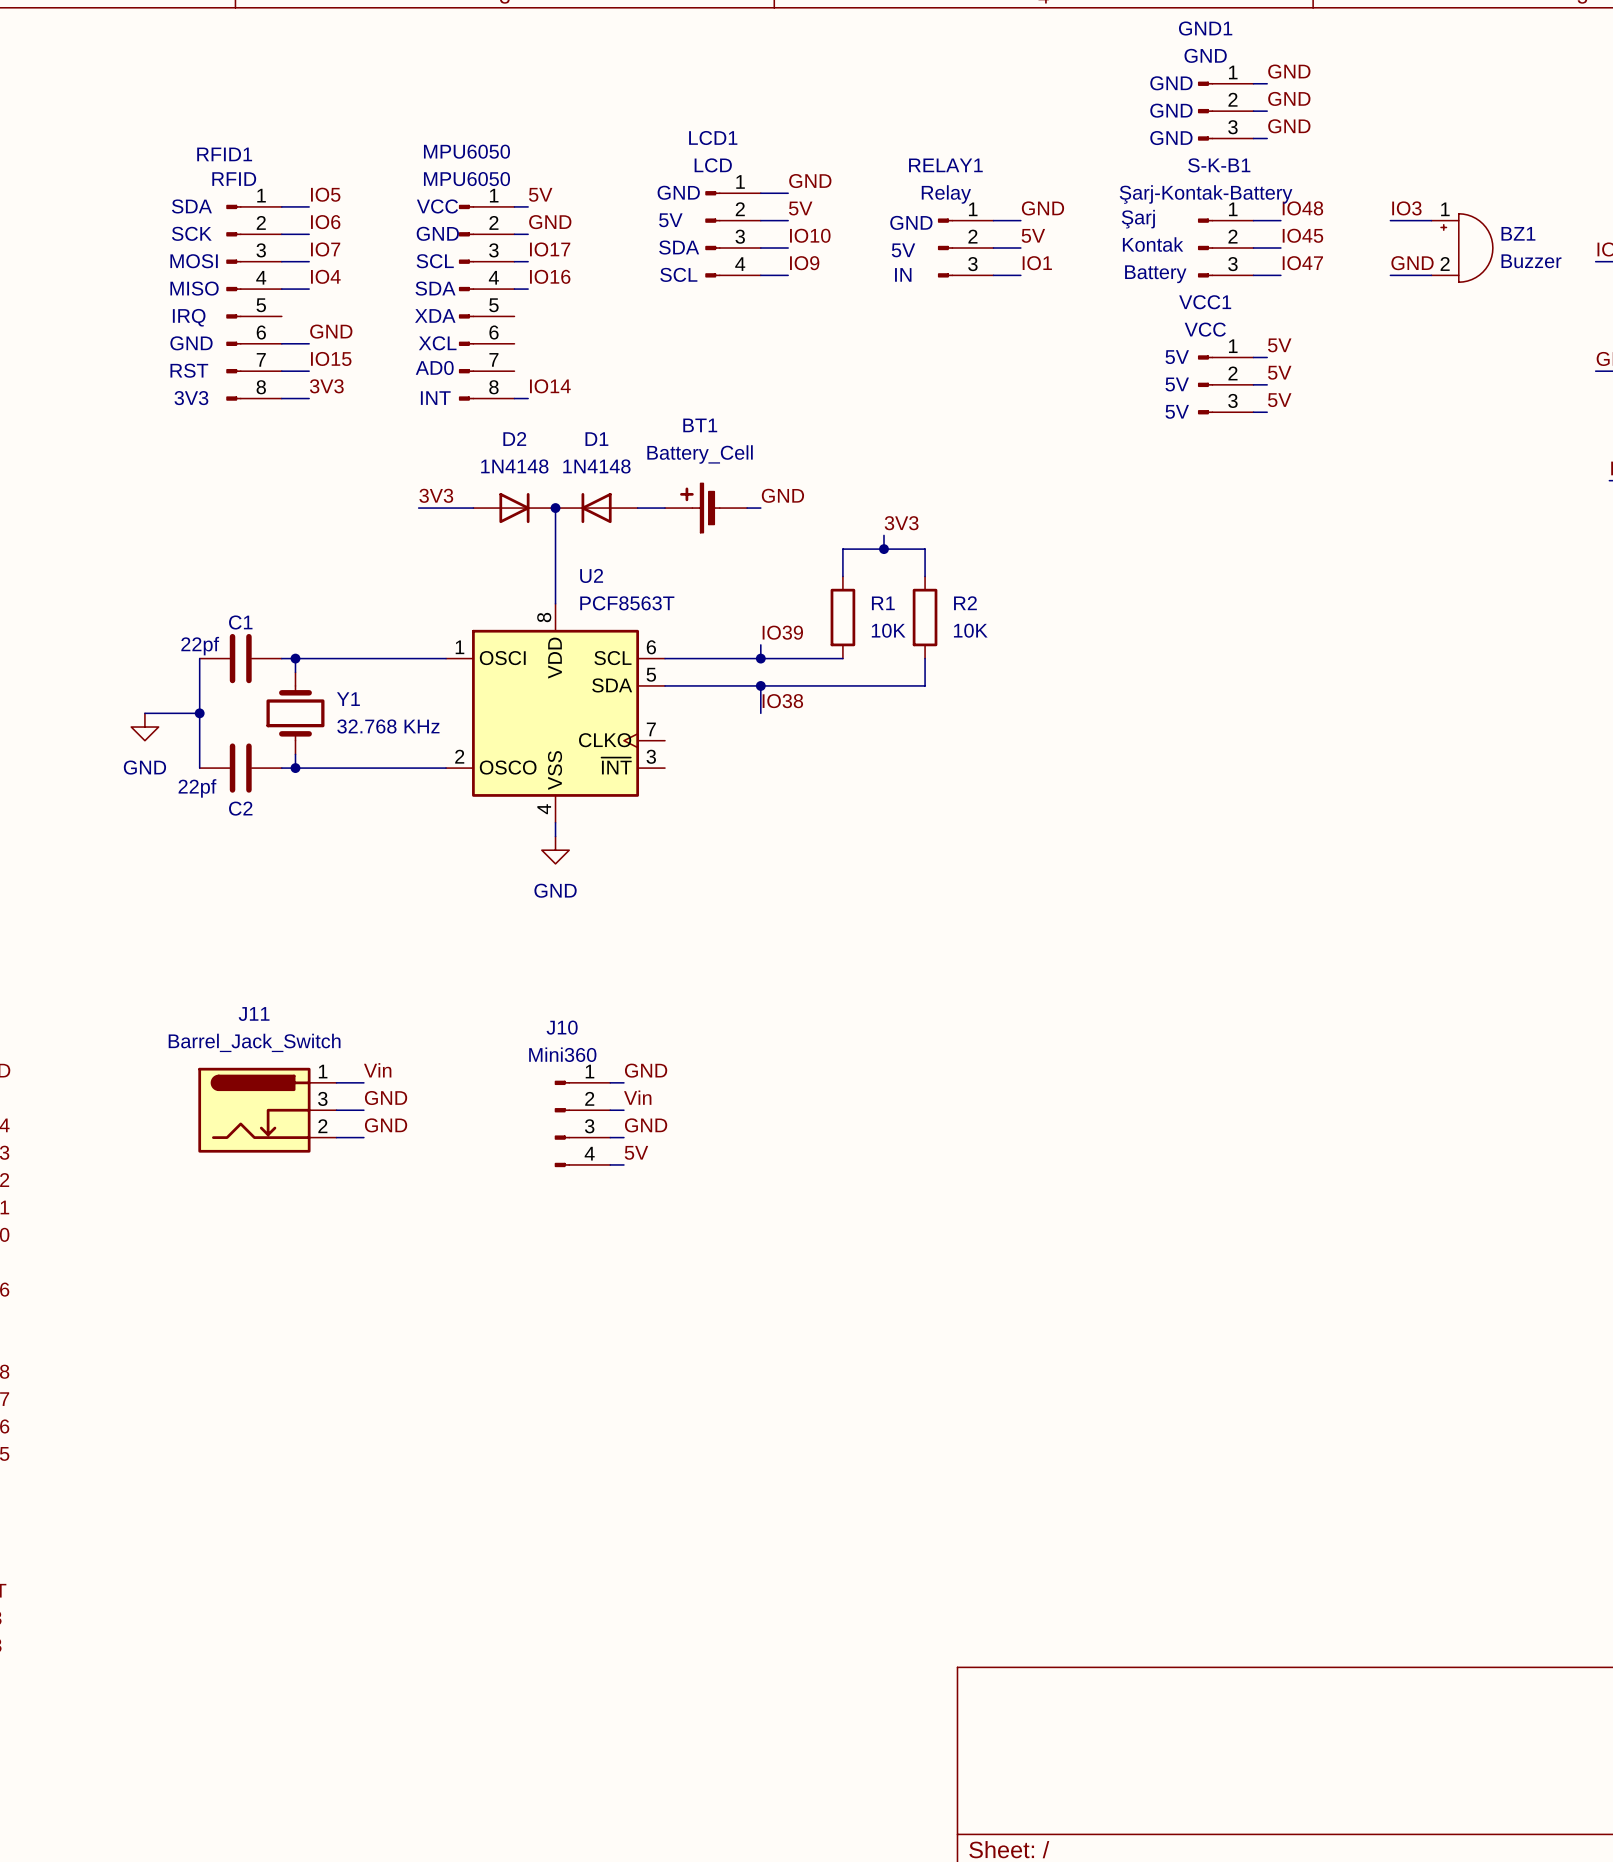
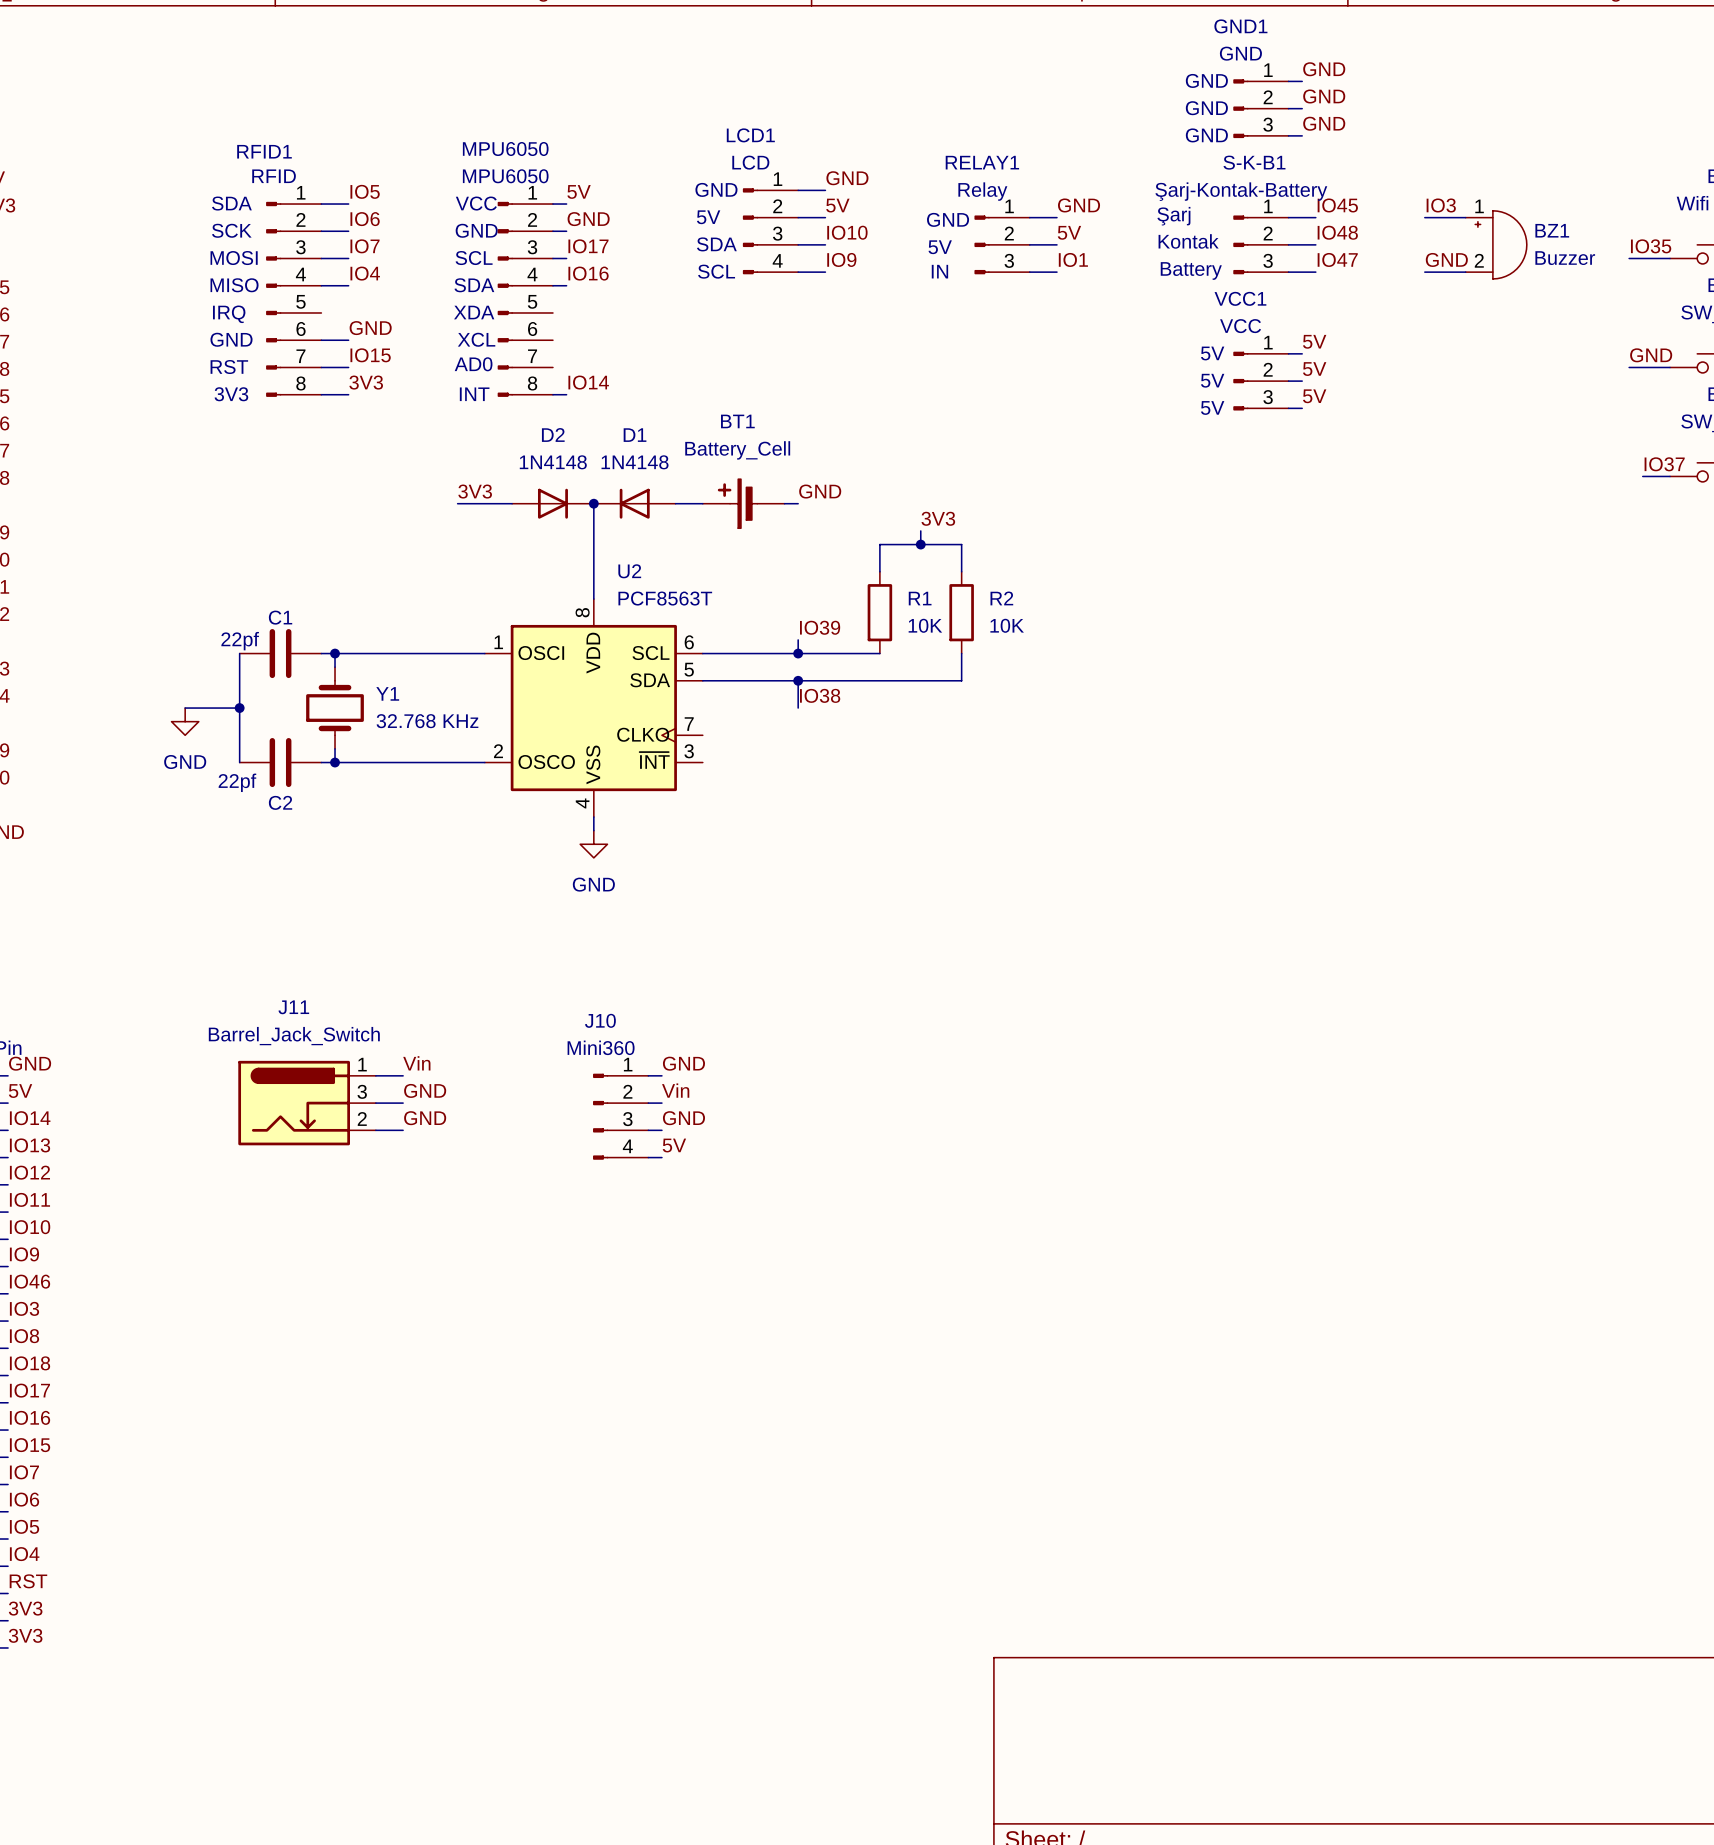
label: IO48 (1302, 208) -> IO45 (1337, 205)
label: IO45 (1302, 235) -> IO48 (1337, 232)

